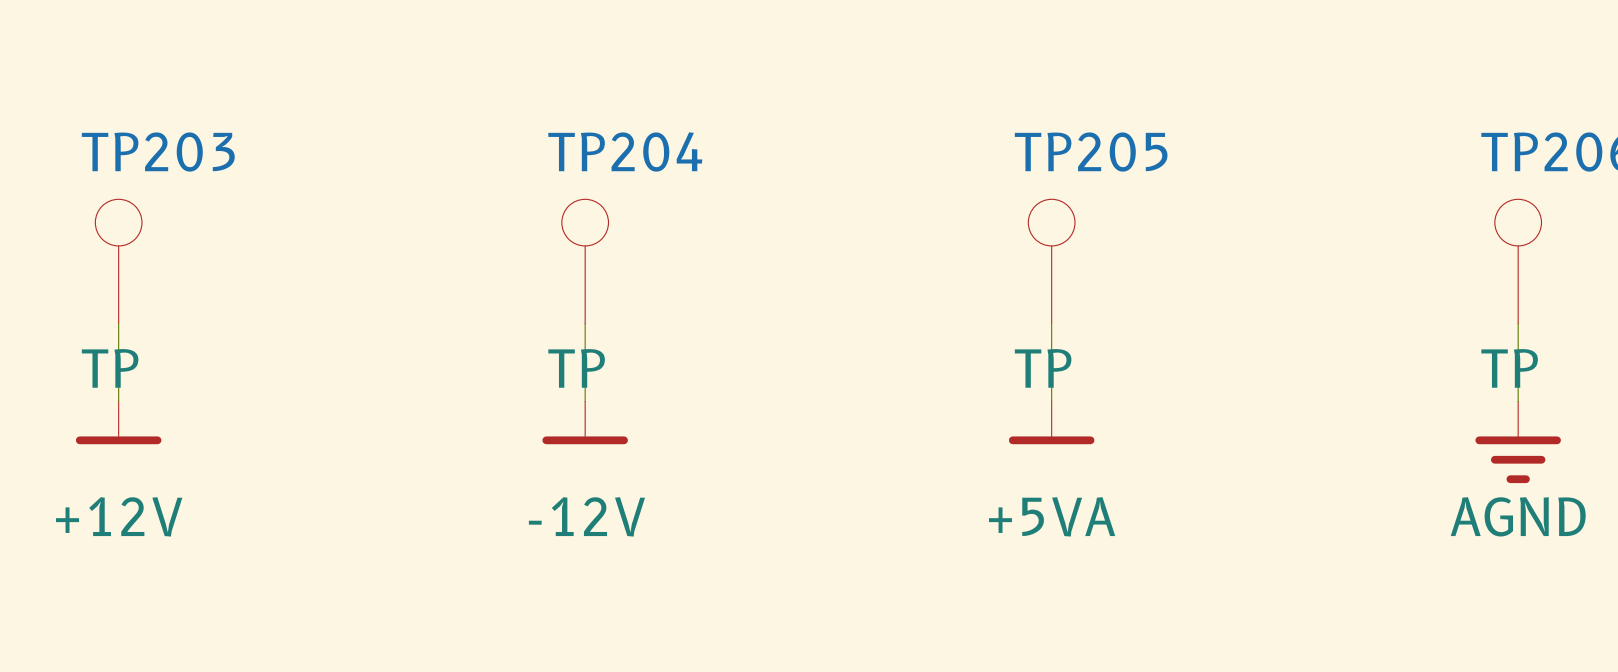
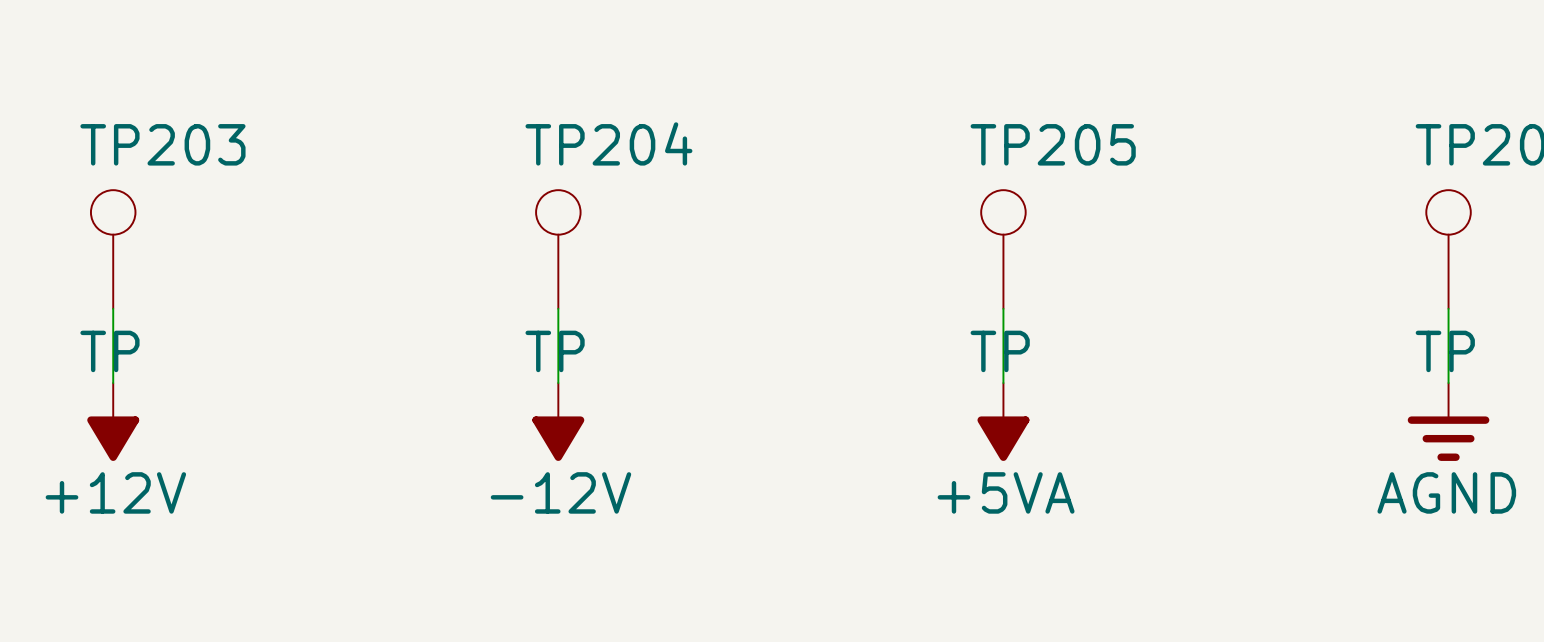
power symbol shape: [75, 401, 162, 445] -> [87, 383, 140, 461]
power symbol shape: [542, 401, 628, 445] -> [532, 383, 585, 461]
power symbol shape: [1008, 401, 1095, 445] -> [977, 383, 1030, 461]

